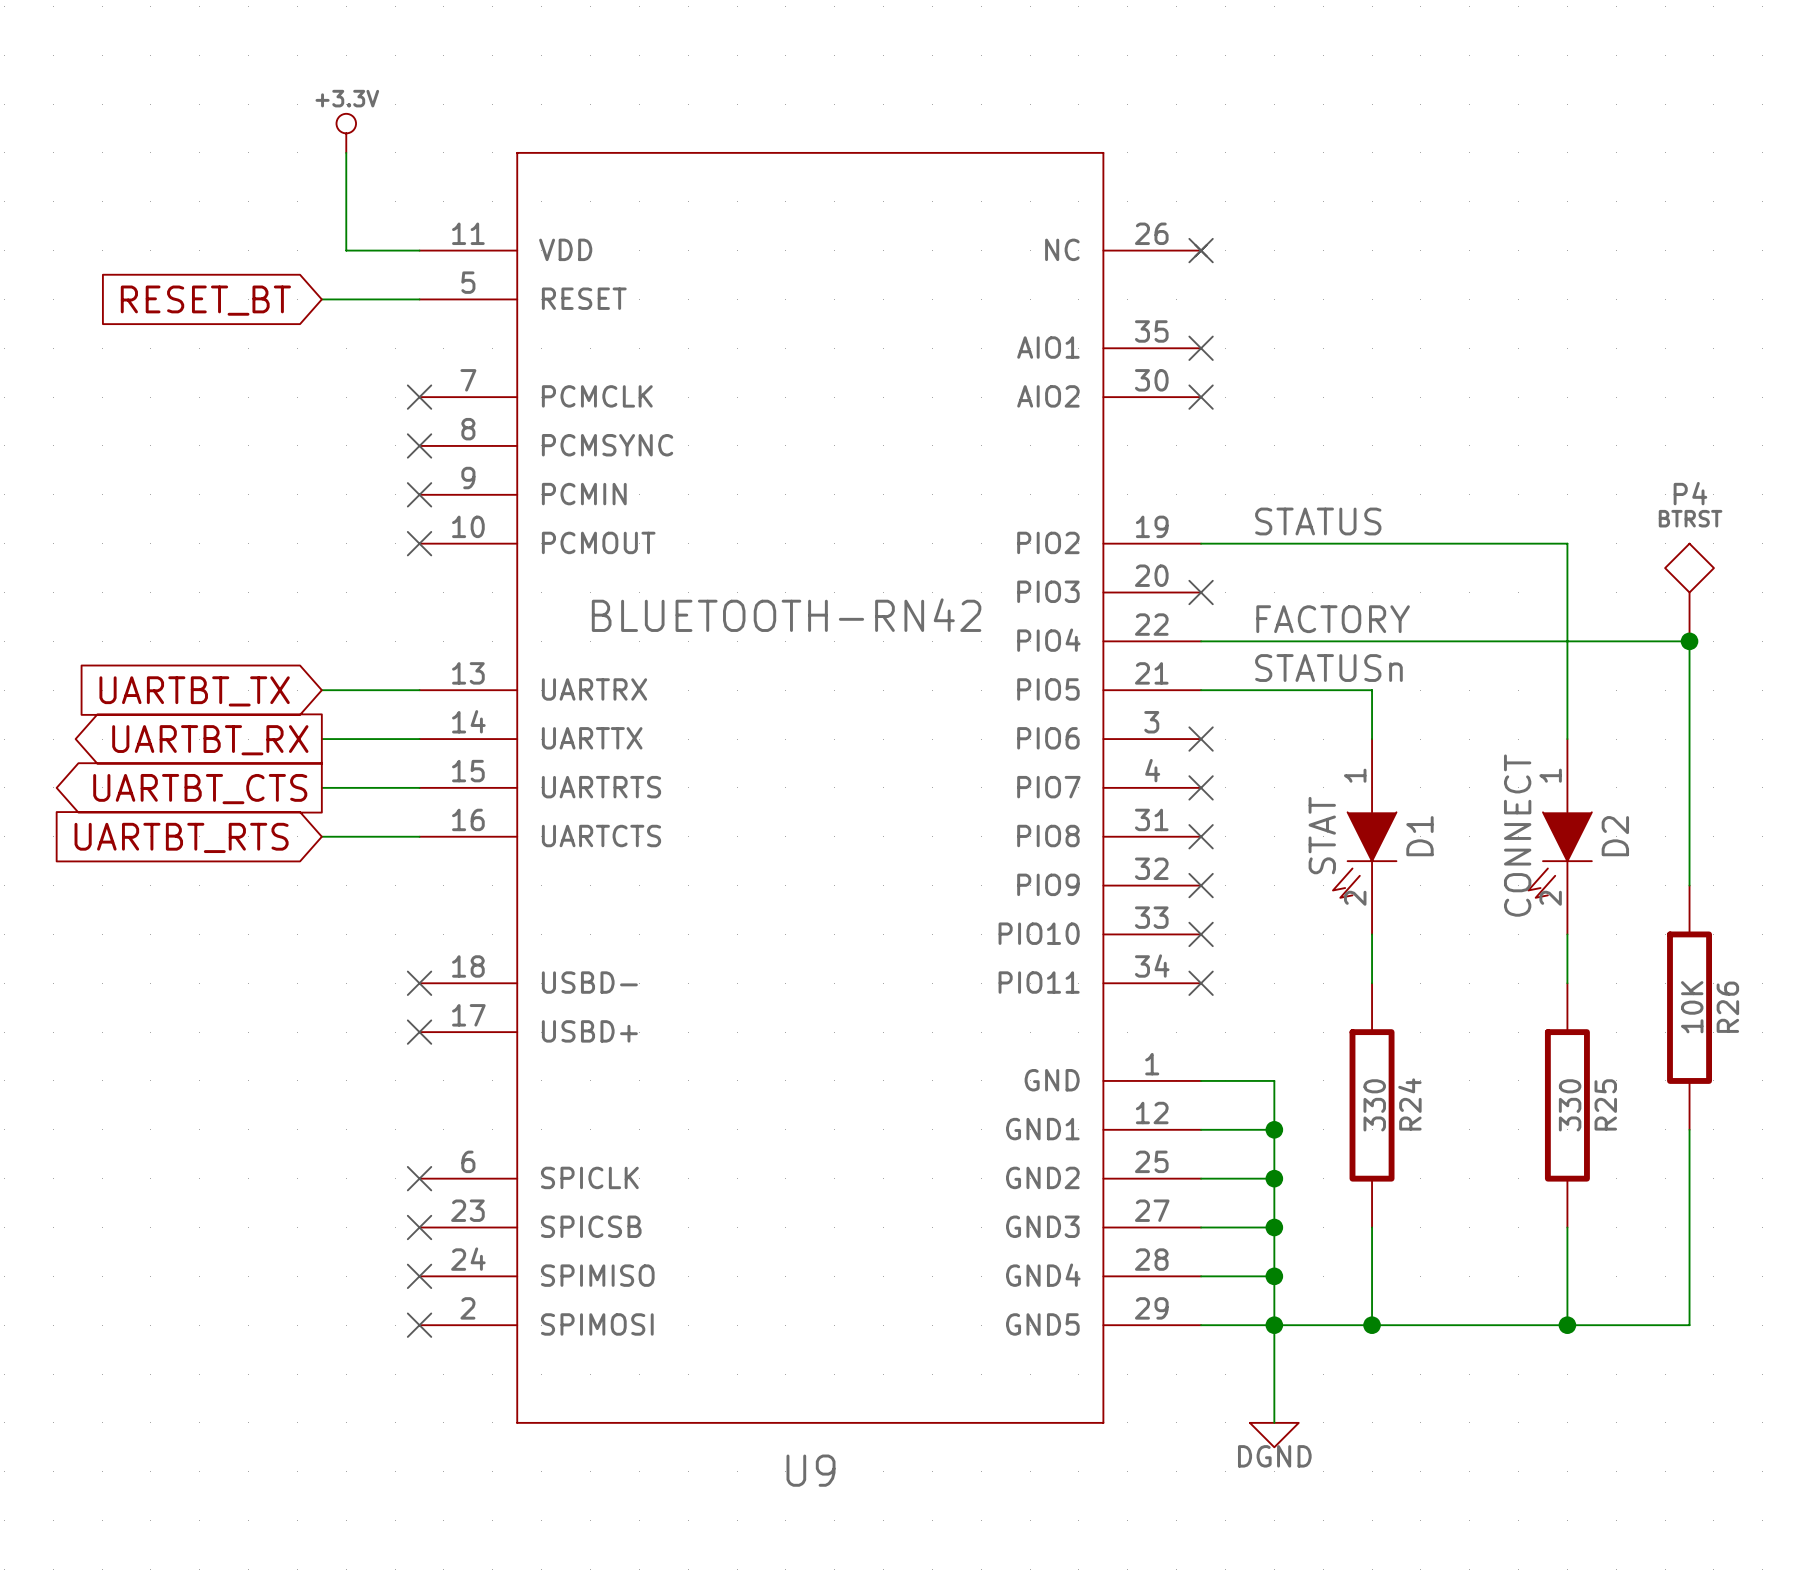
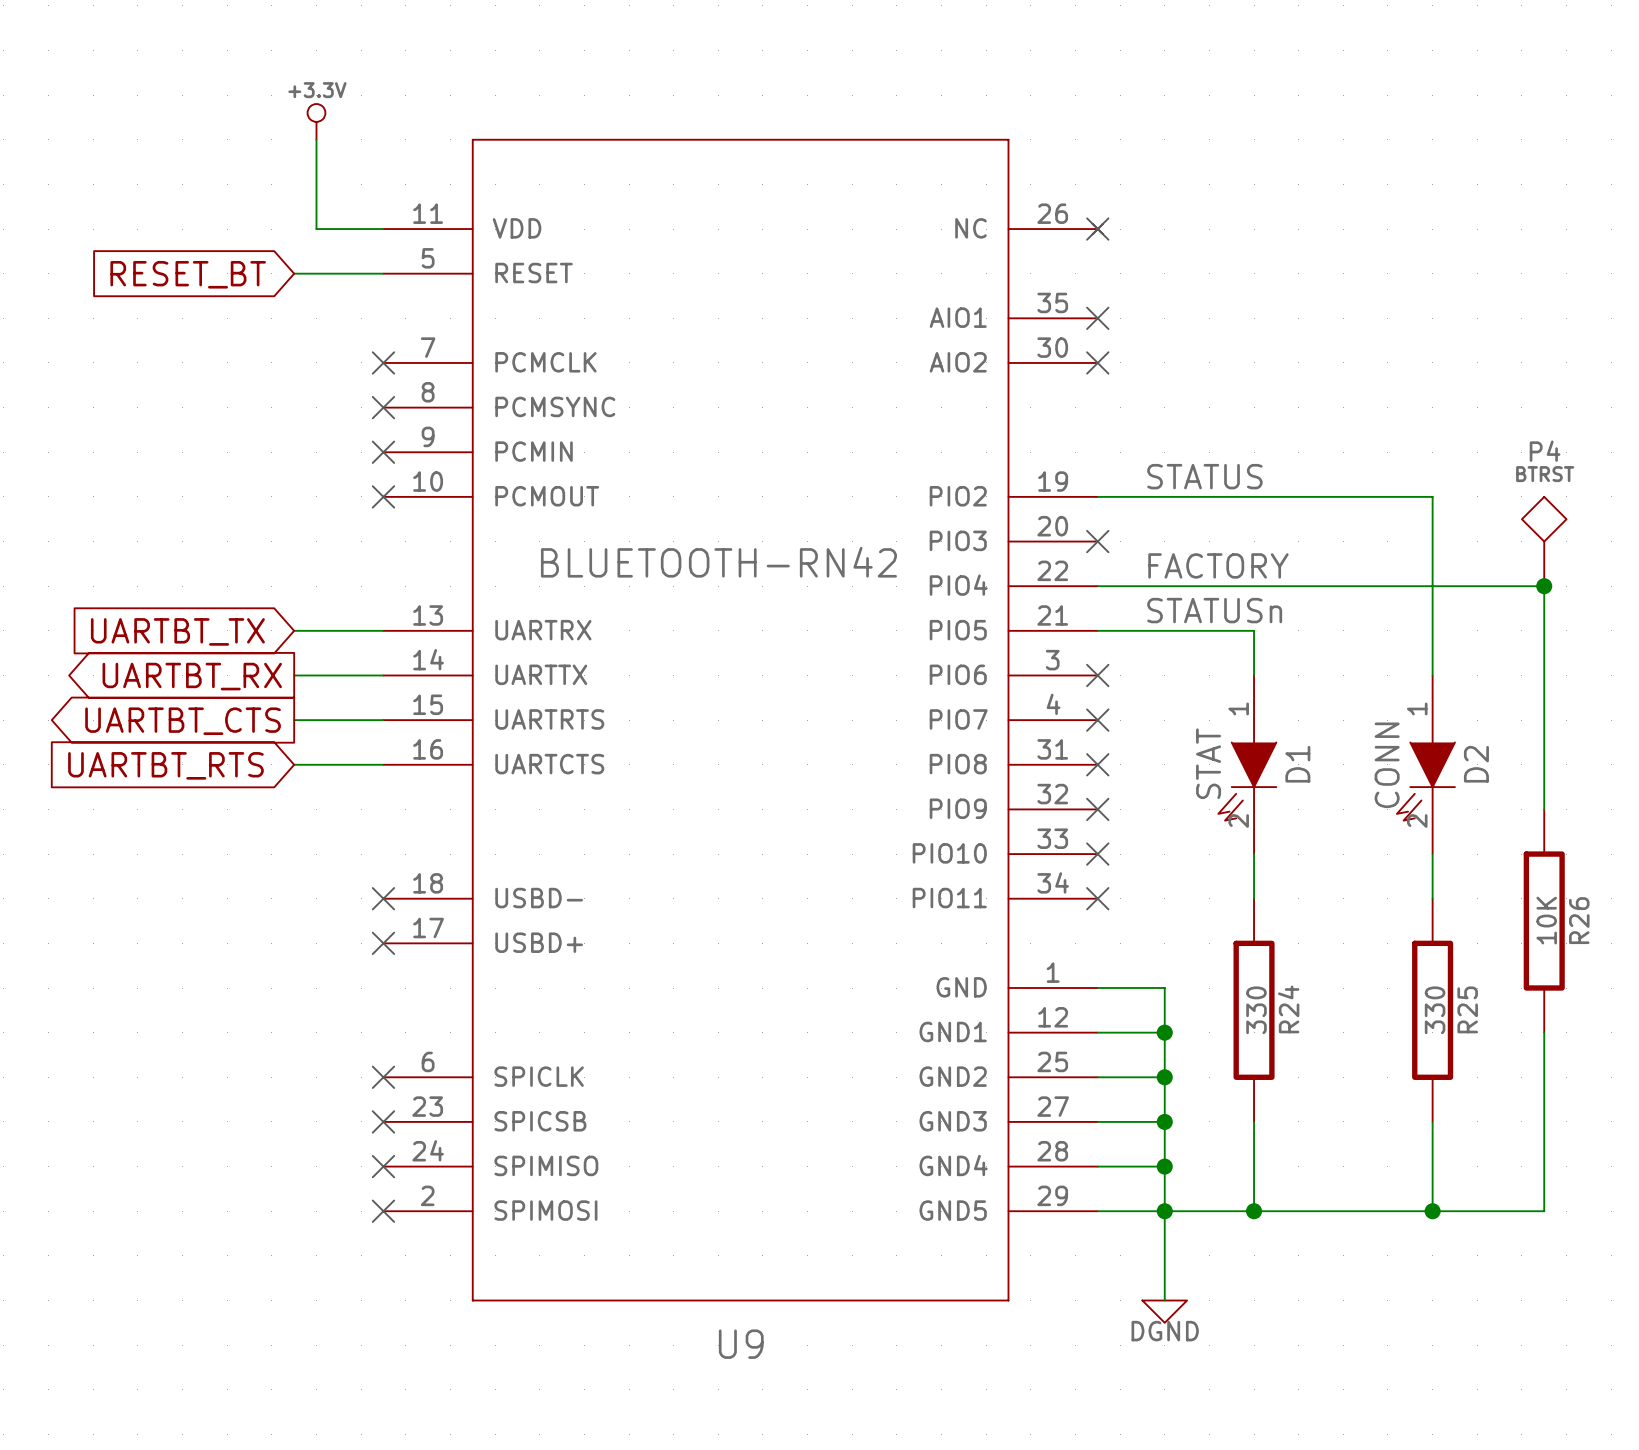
D2 value: CONNECT (1517, 835) -> CONN (1387, 765)

